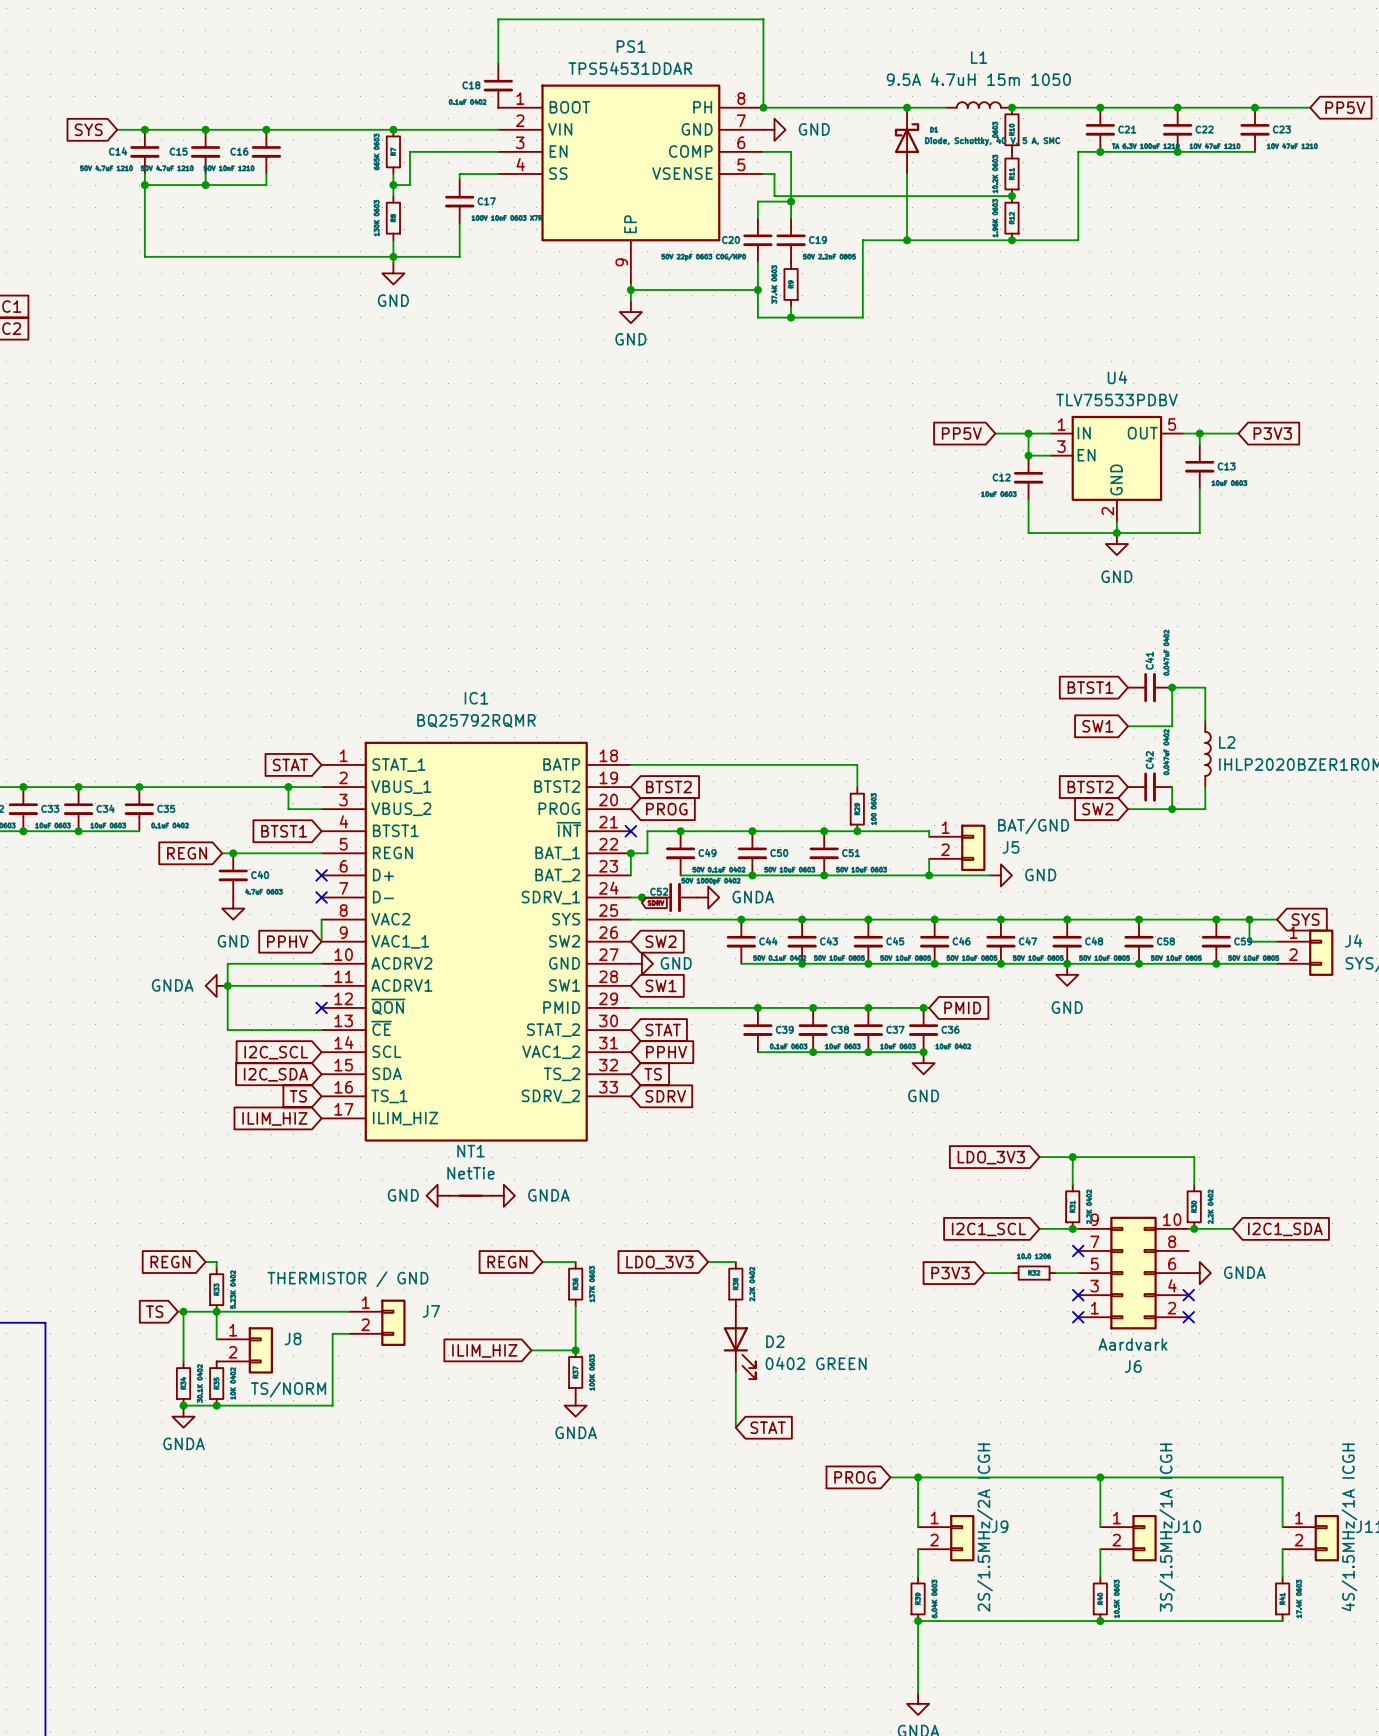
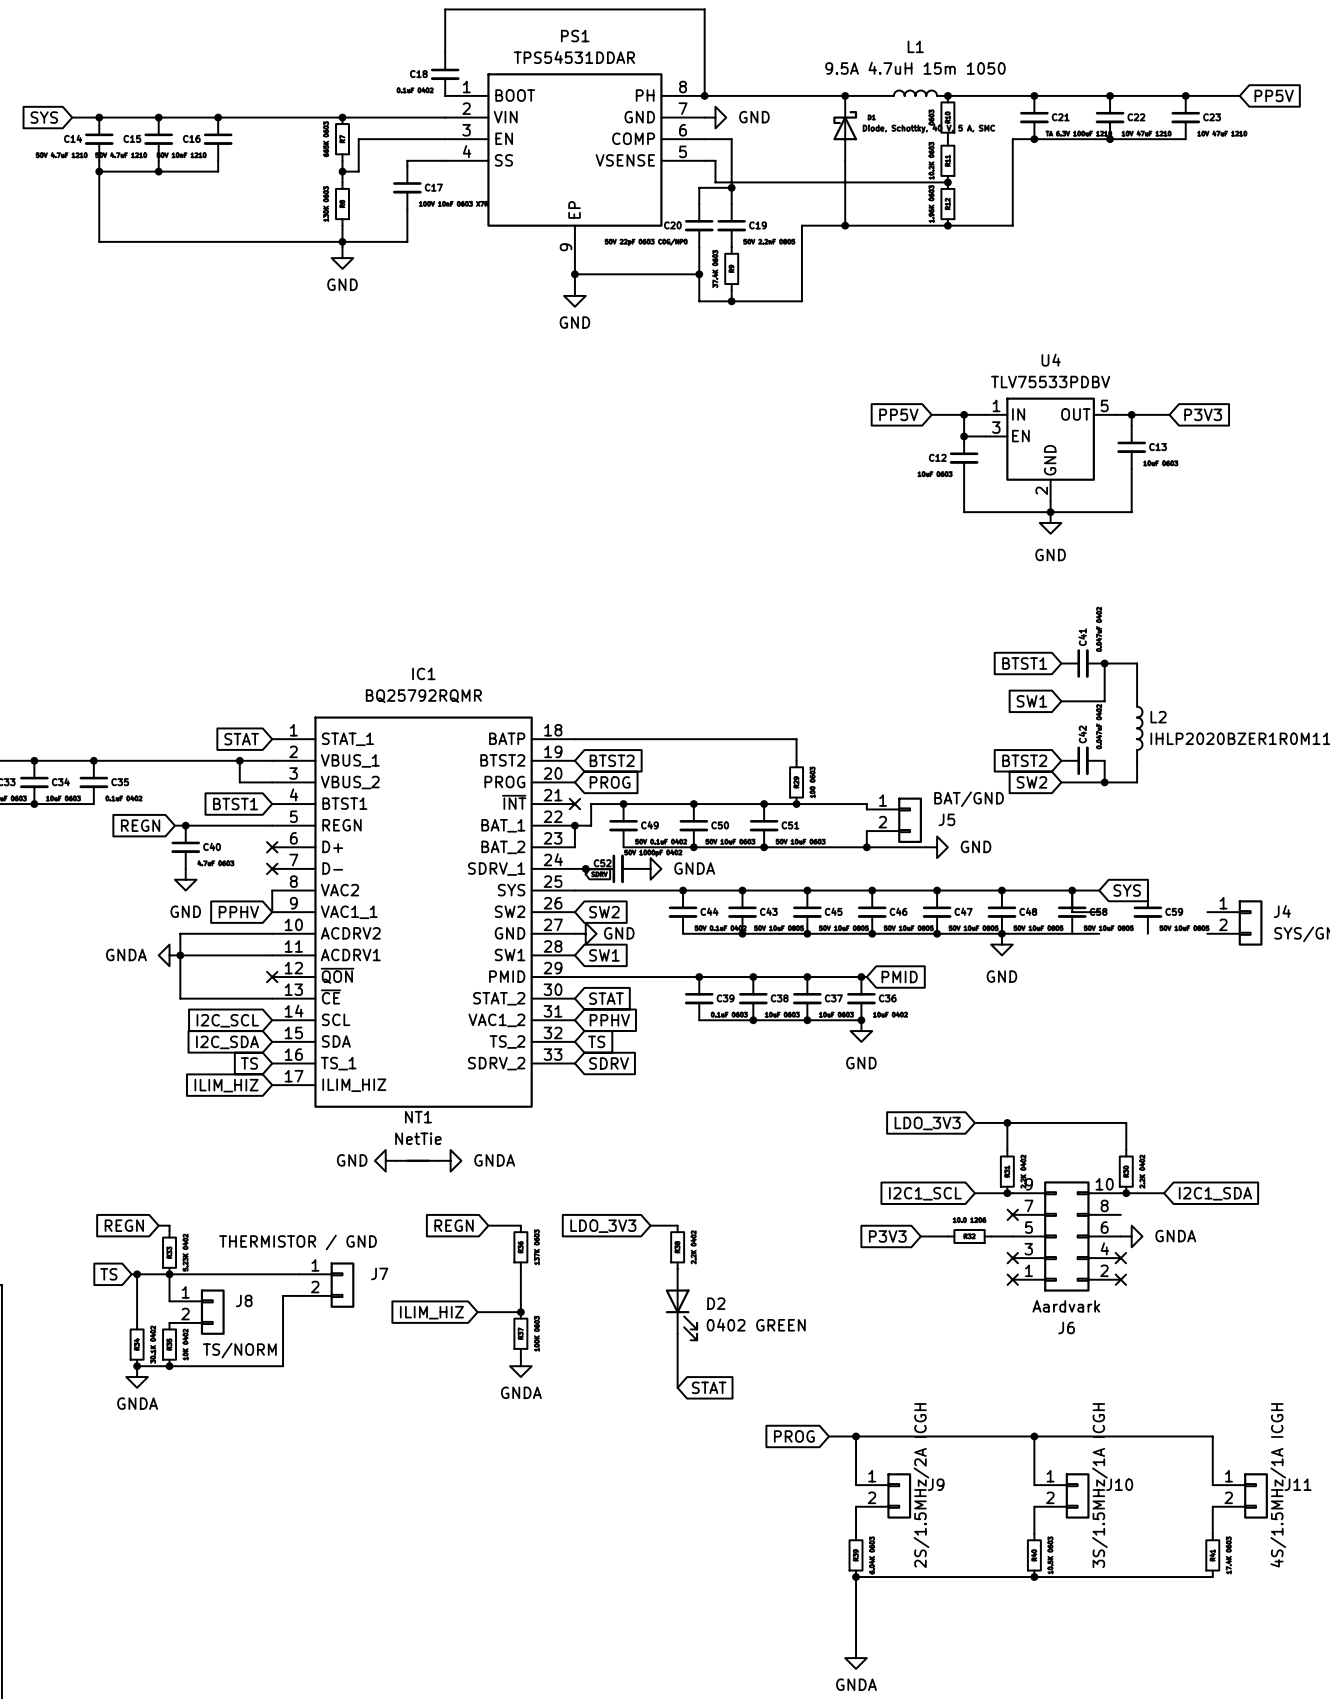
wire: (1166, 919) (1277, 919) -> none
junction: (1216, 919) -> none
wire: (1249, 919) (1249, 941) (1277, 941) -> (1072, 890) (1072, 912) (1099, 912)
junction: (1249, 919) -> none
global label position: SYS (1305, 919) -> SYS (1127, 890)
junction: (1139, 963) -> none
wire: (1166, 963) (1277, 963) -> none
junction: (1216, 963) -> none

